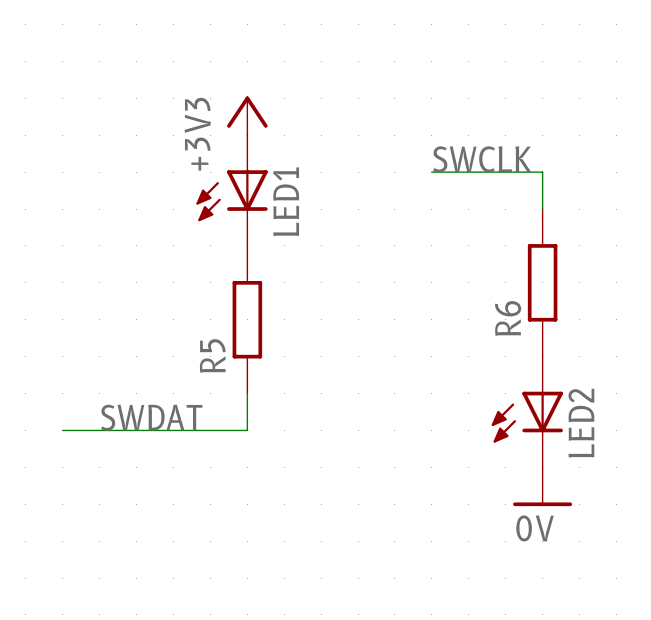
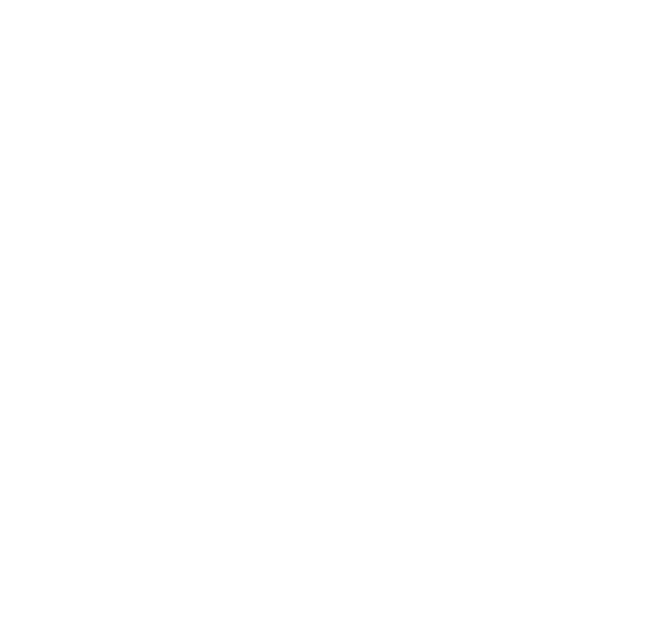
power symbol: +3V3 (247, 115) -> none
label: SWCLK (482, 159) -> none
wire: (431, 172) (542, 172) (542, 209) -> none
LED1: (232, 190) -> none
R6: (542, 282) -> none
R5: (247, 319) -> none
wire: (247, 393) (247, 430) (62, 430) -> none
LED2: (527, 412) -> none
label: SWDAT (151, 417) -> none
power symbol: 0V (542, 486) -> none

